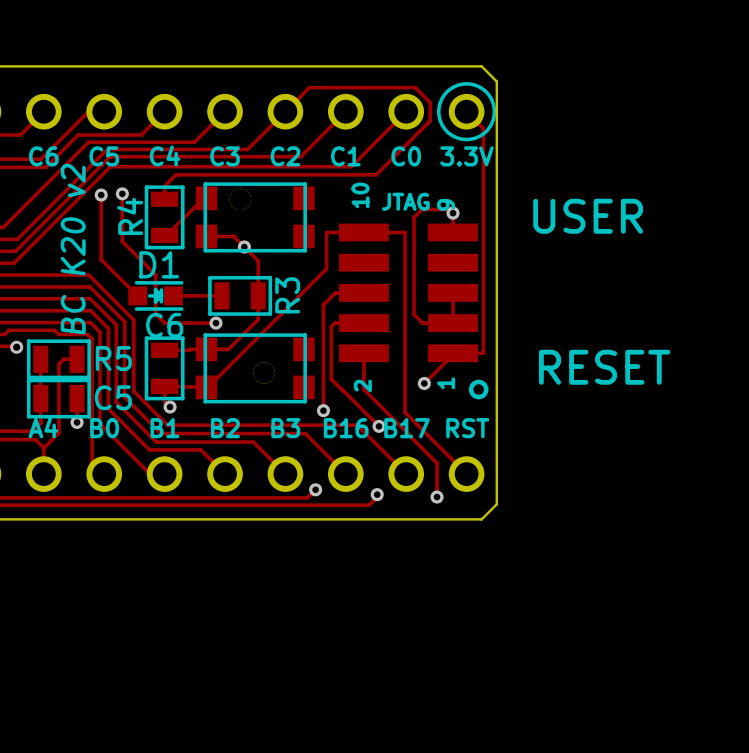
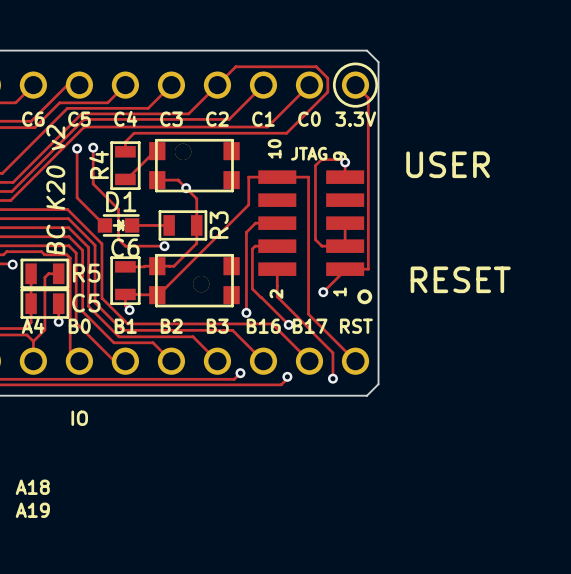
text: none -> IO (79, 418)
text: none -> A18 (32, 487)
text: none -> A19 (32, 510)

